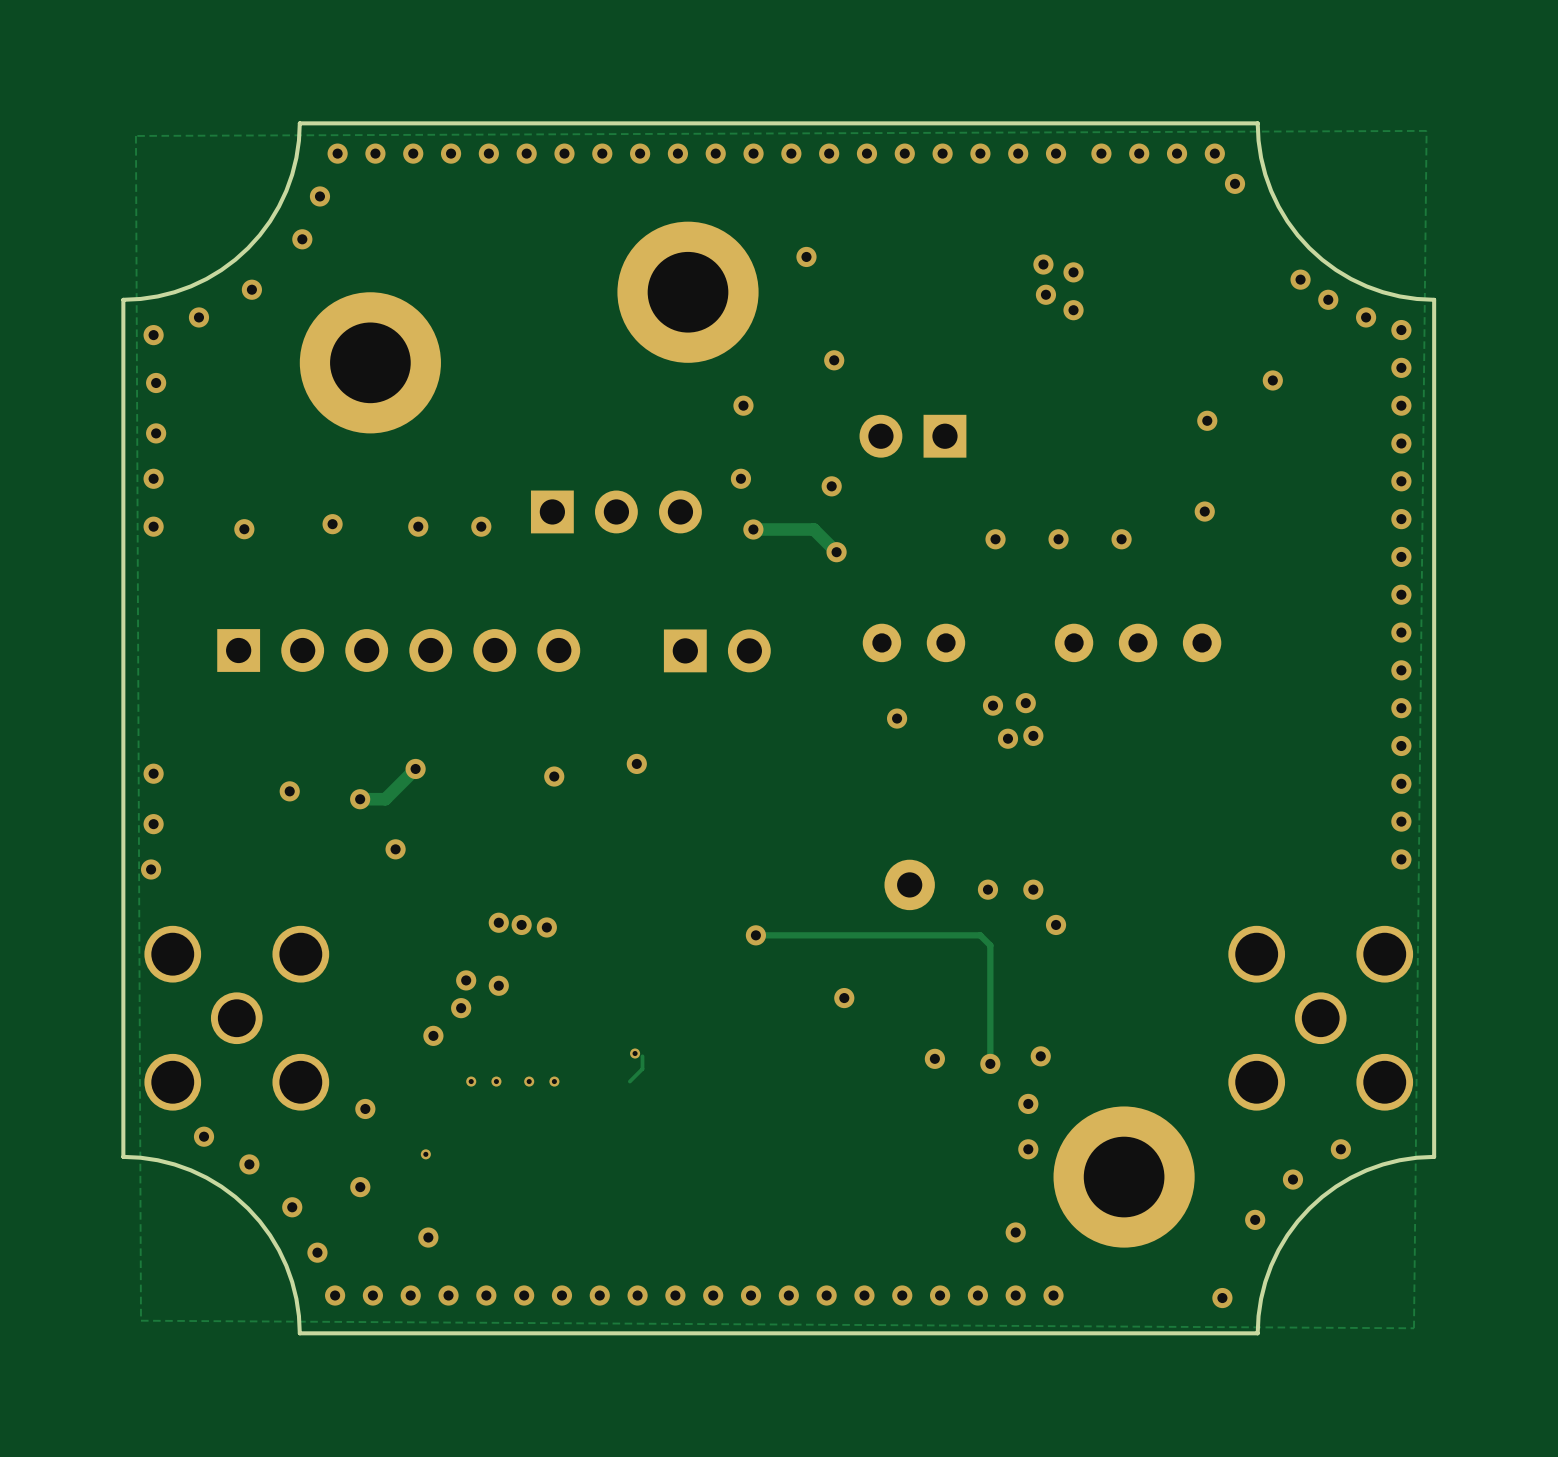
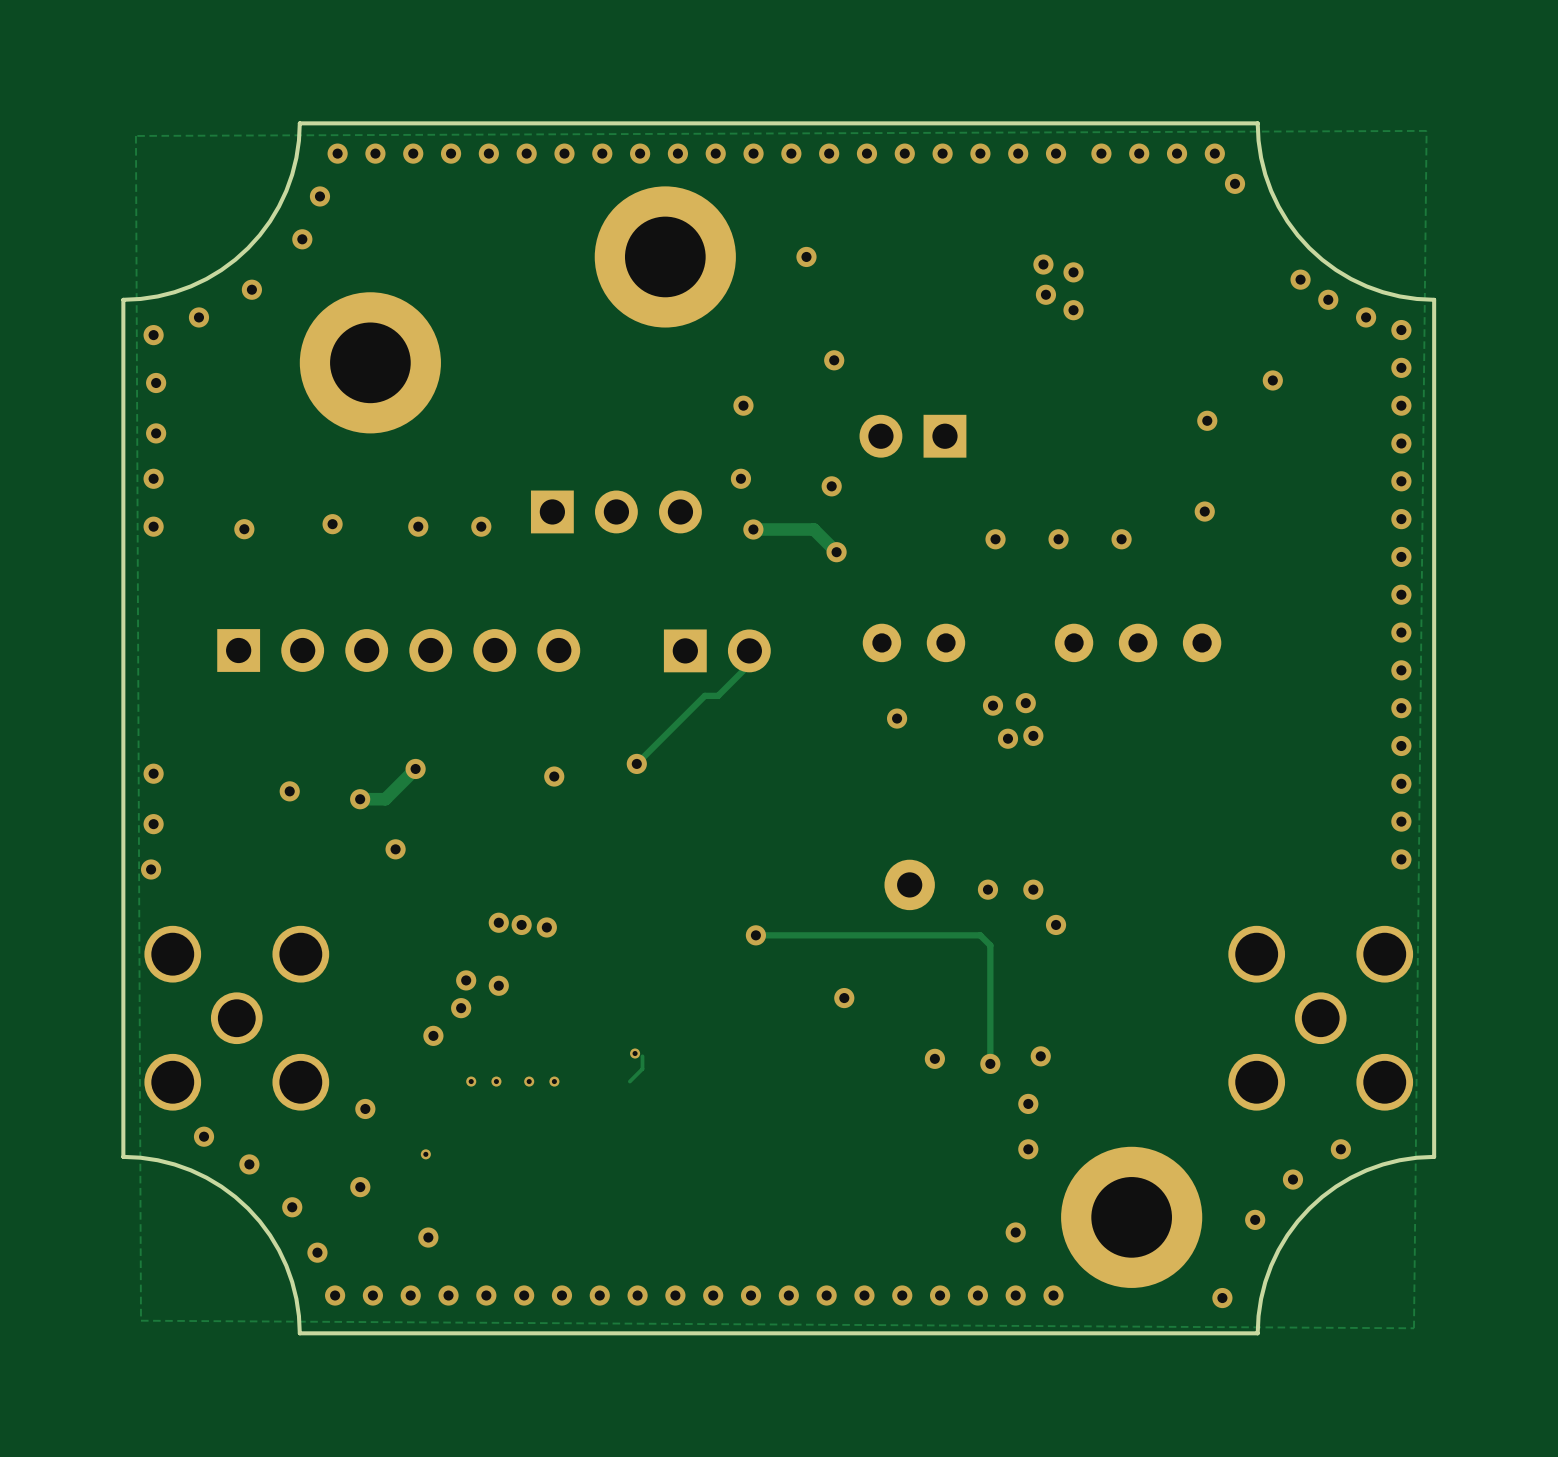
part position: (688, 292) -> (665, 256)
track: none -> (749, 650) (749, 664) (718, 695) (704, 695) (636, 763)
part position: (1124, 1177) -> (1131, 1217)

